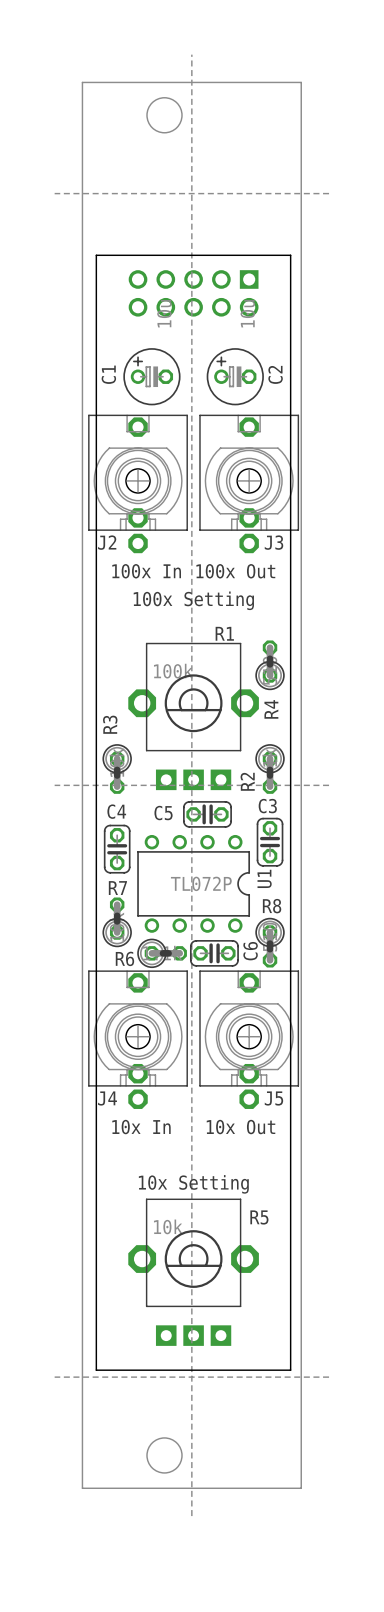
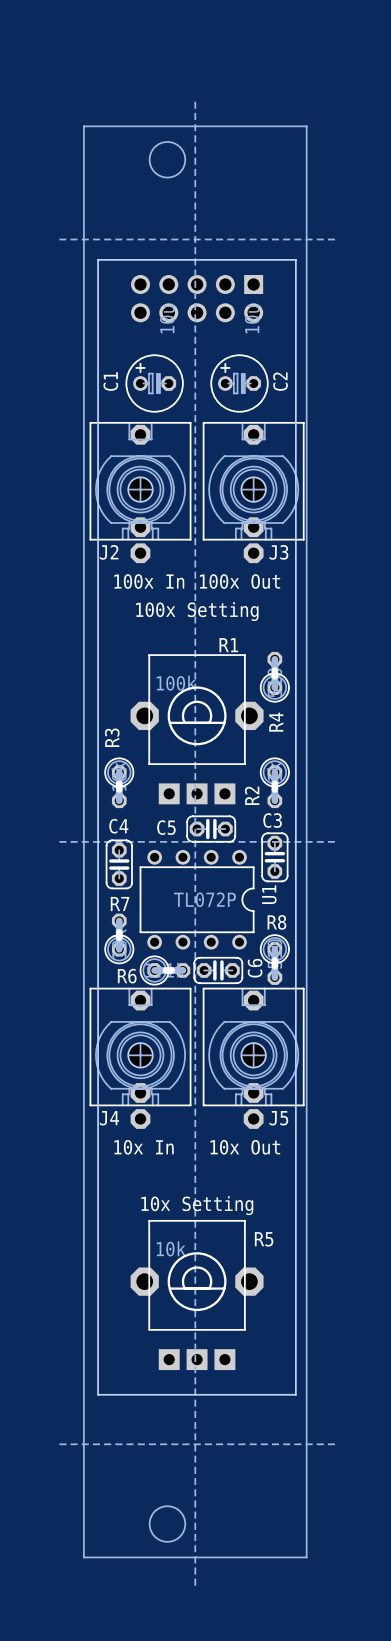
drawing position: (191, 785) -> (195, 841)

